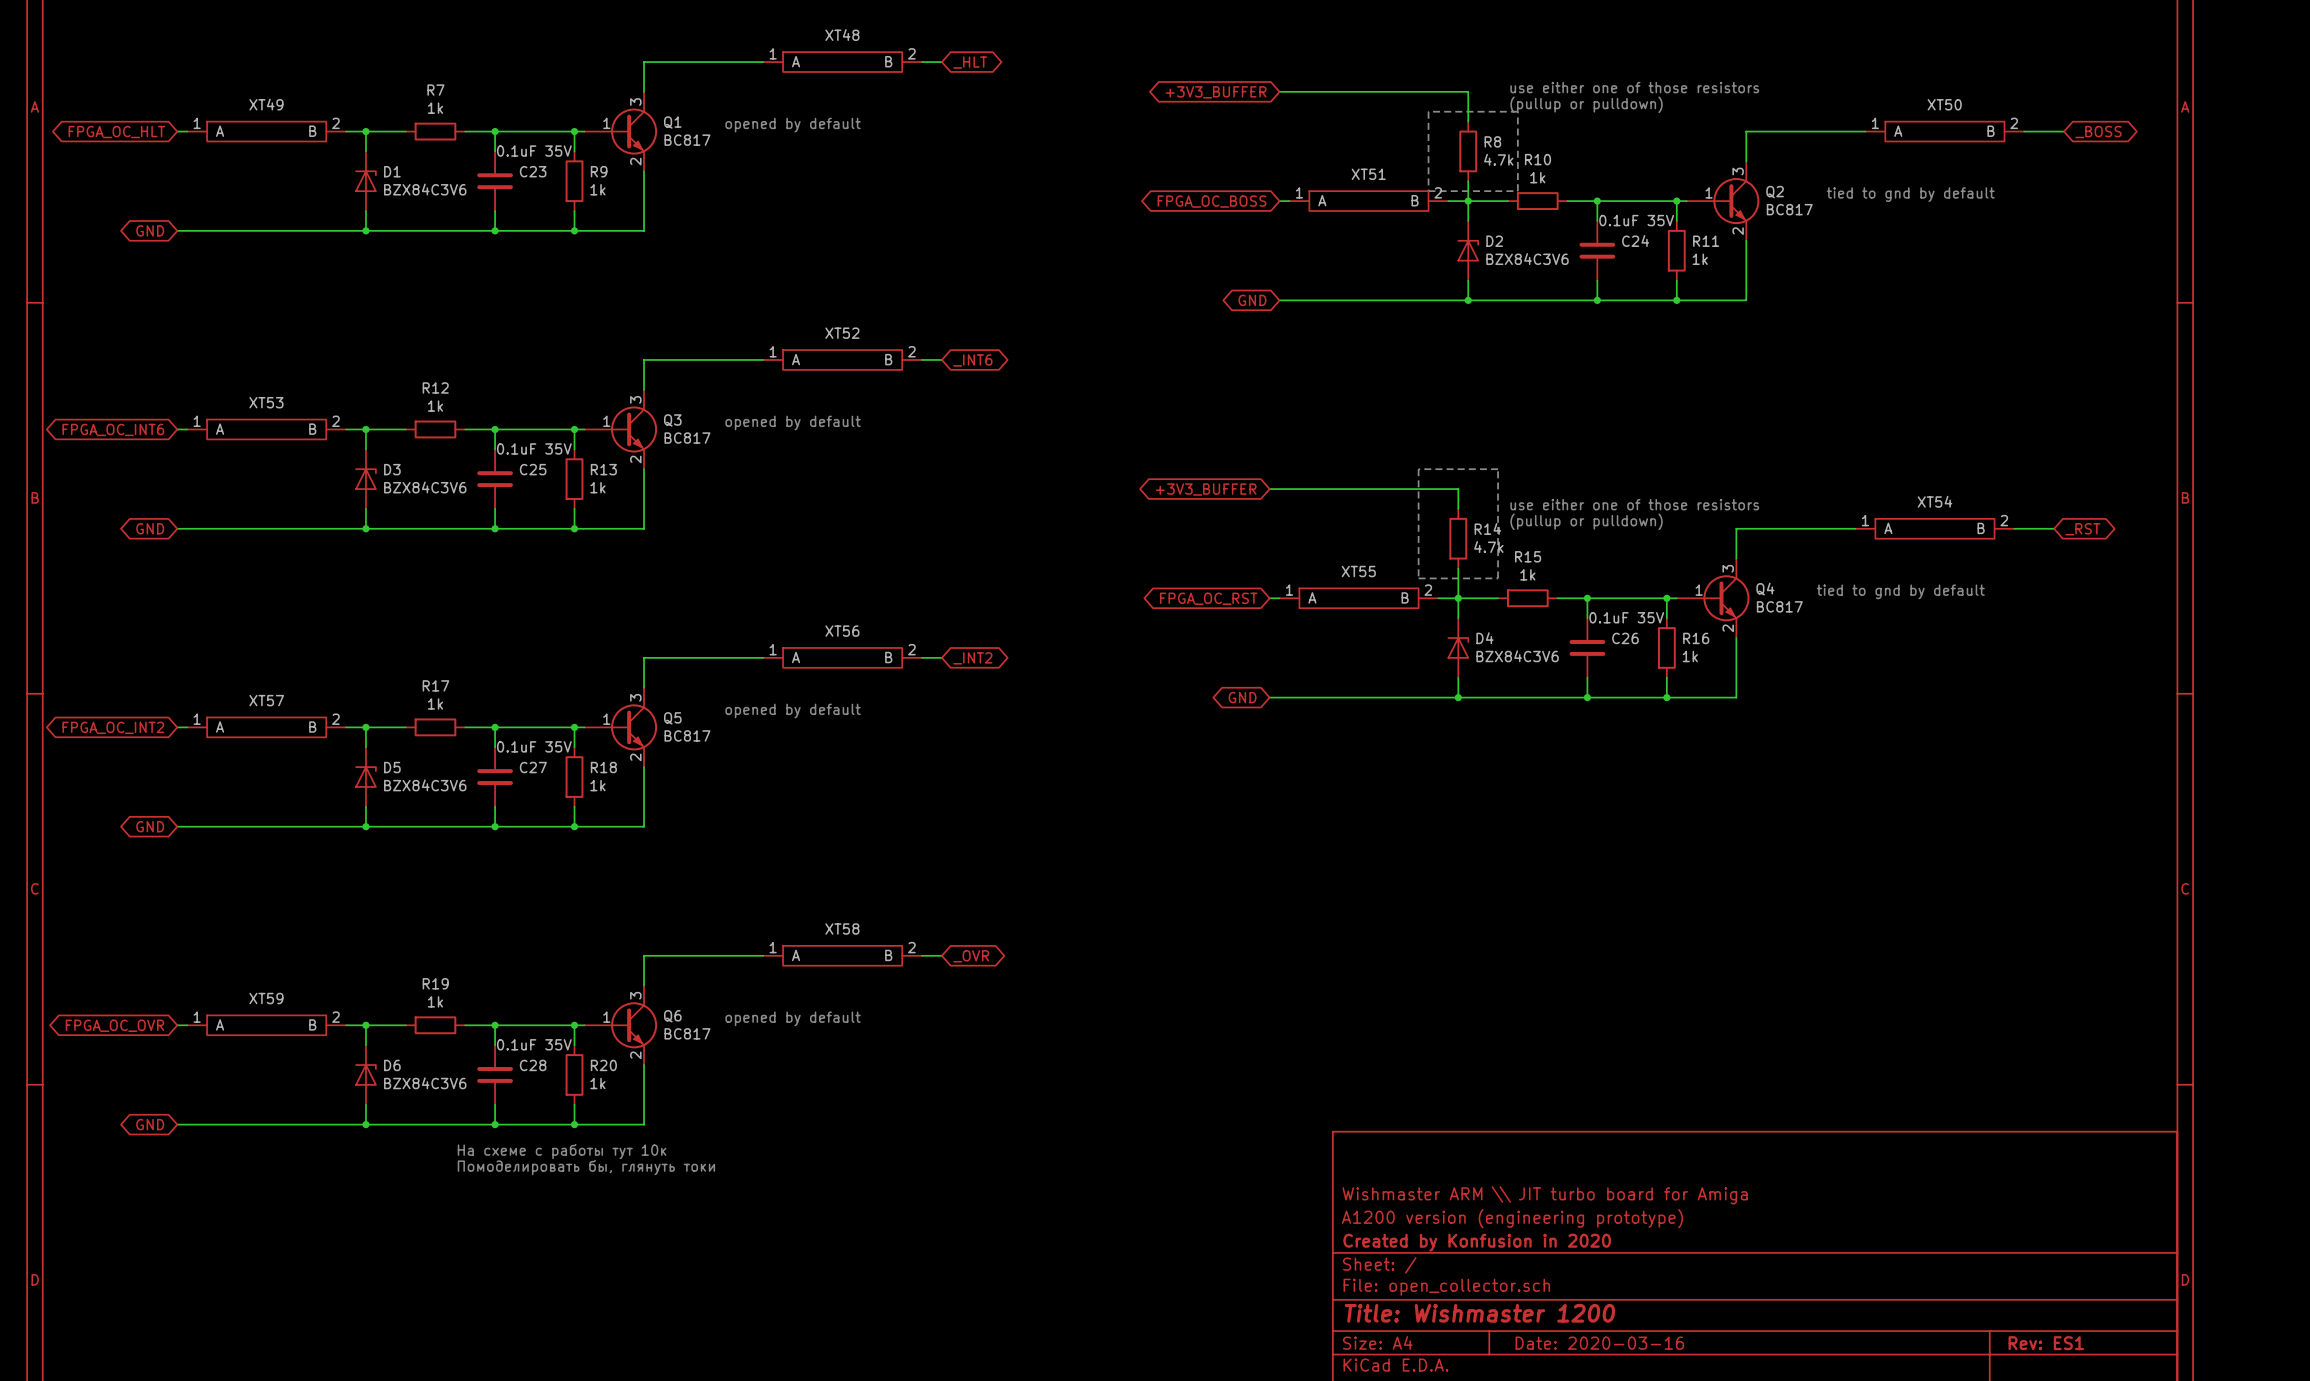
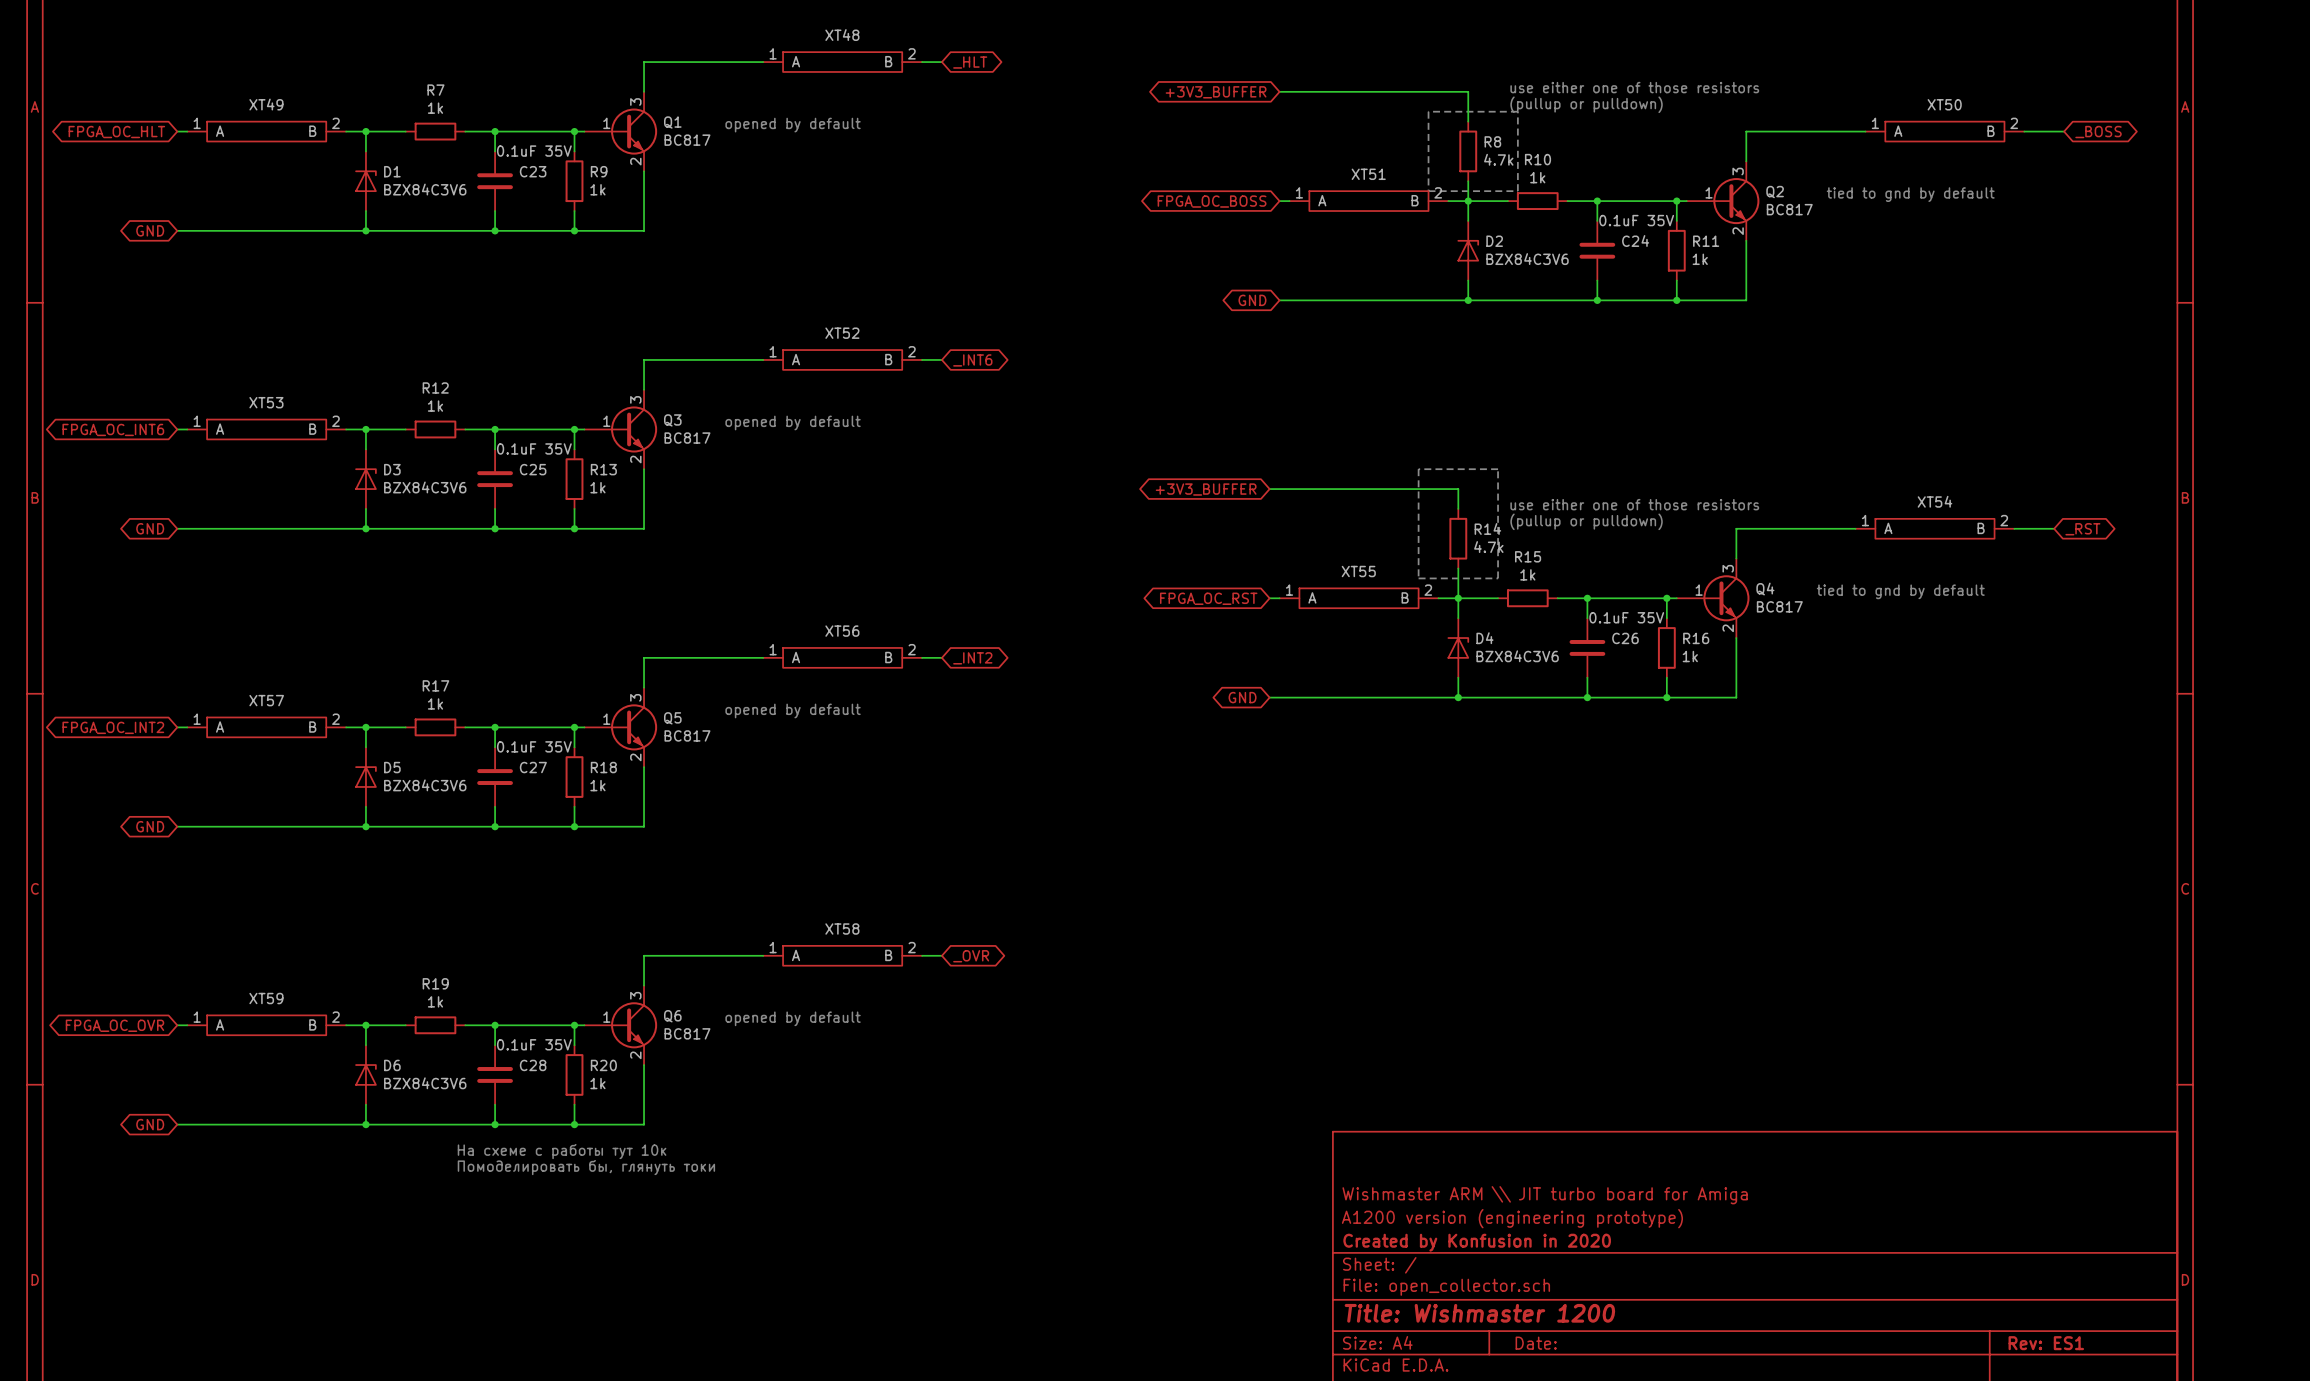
title block: Date: 2020-03-16 (1599, 1343) -> Date: (1536, 1343)

